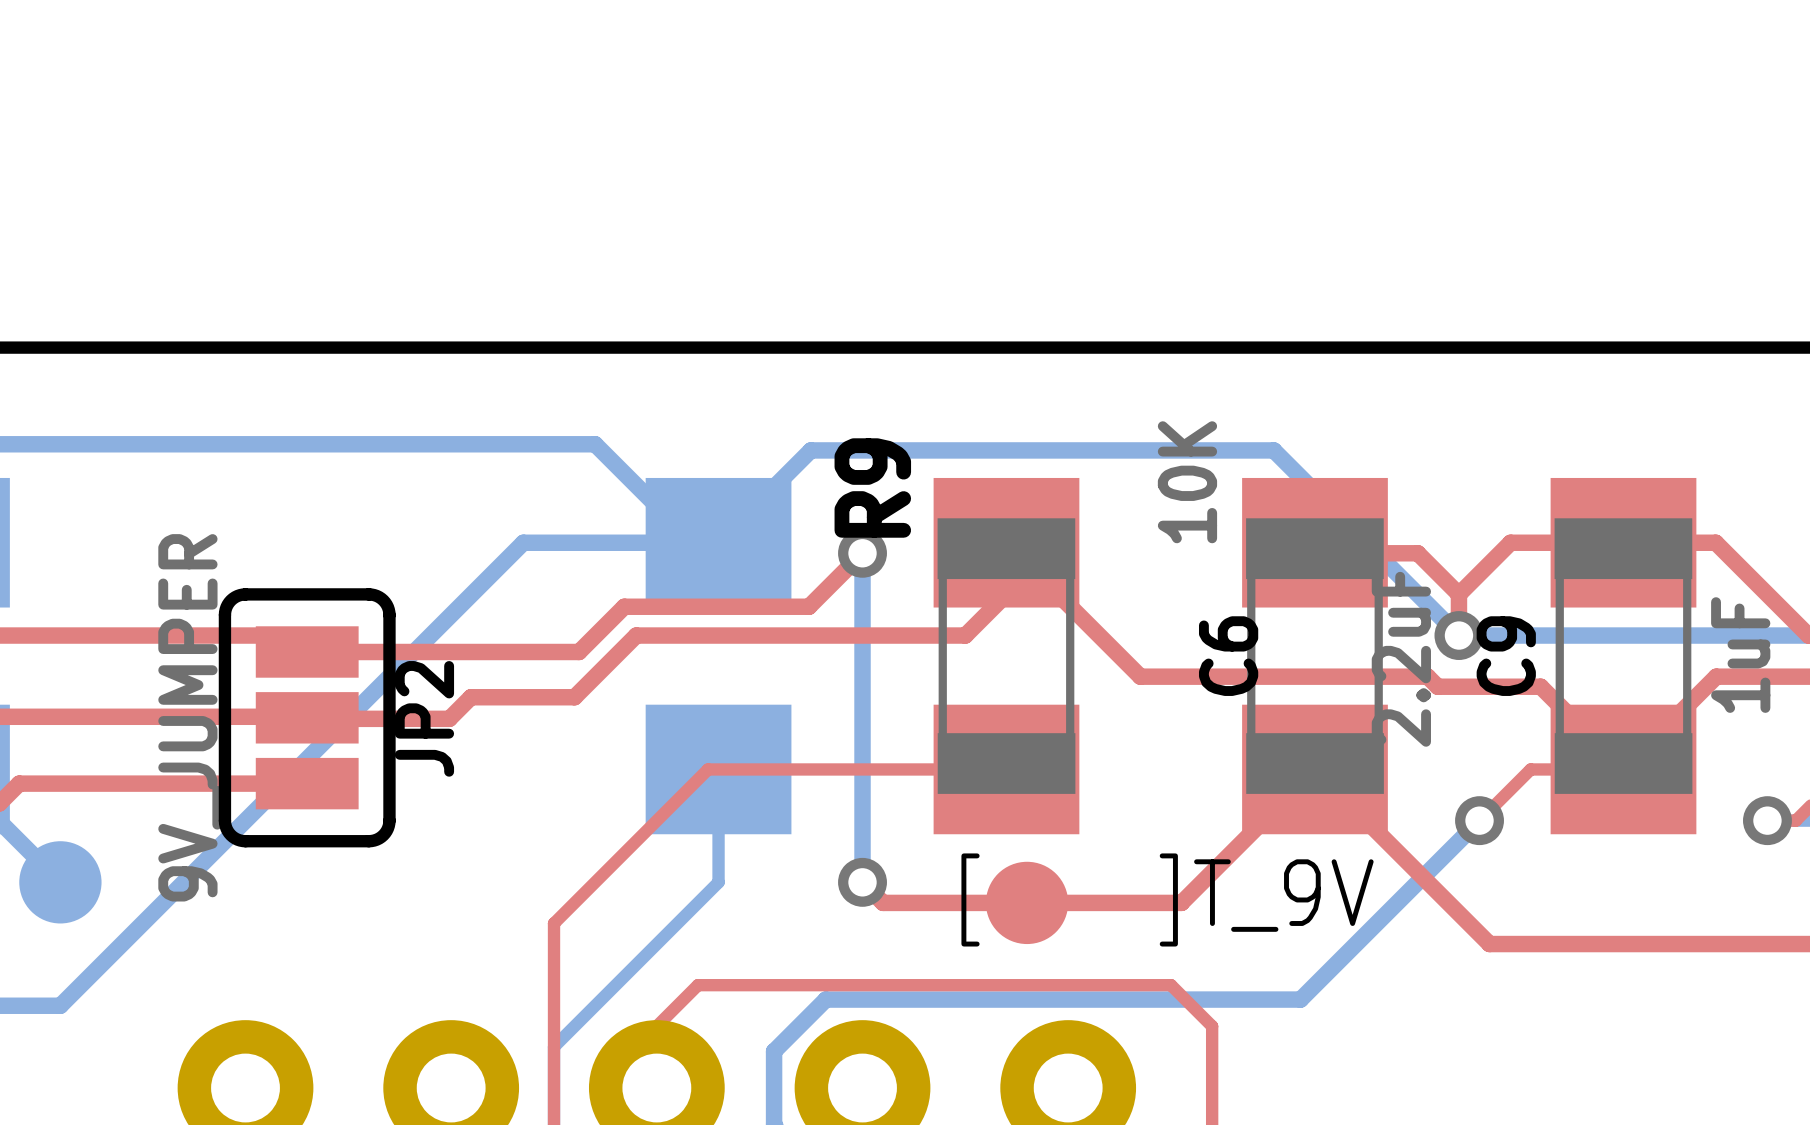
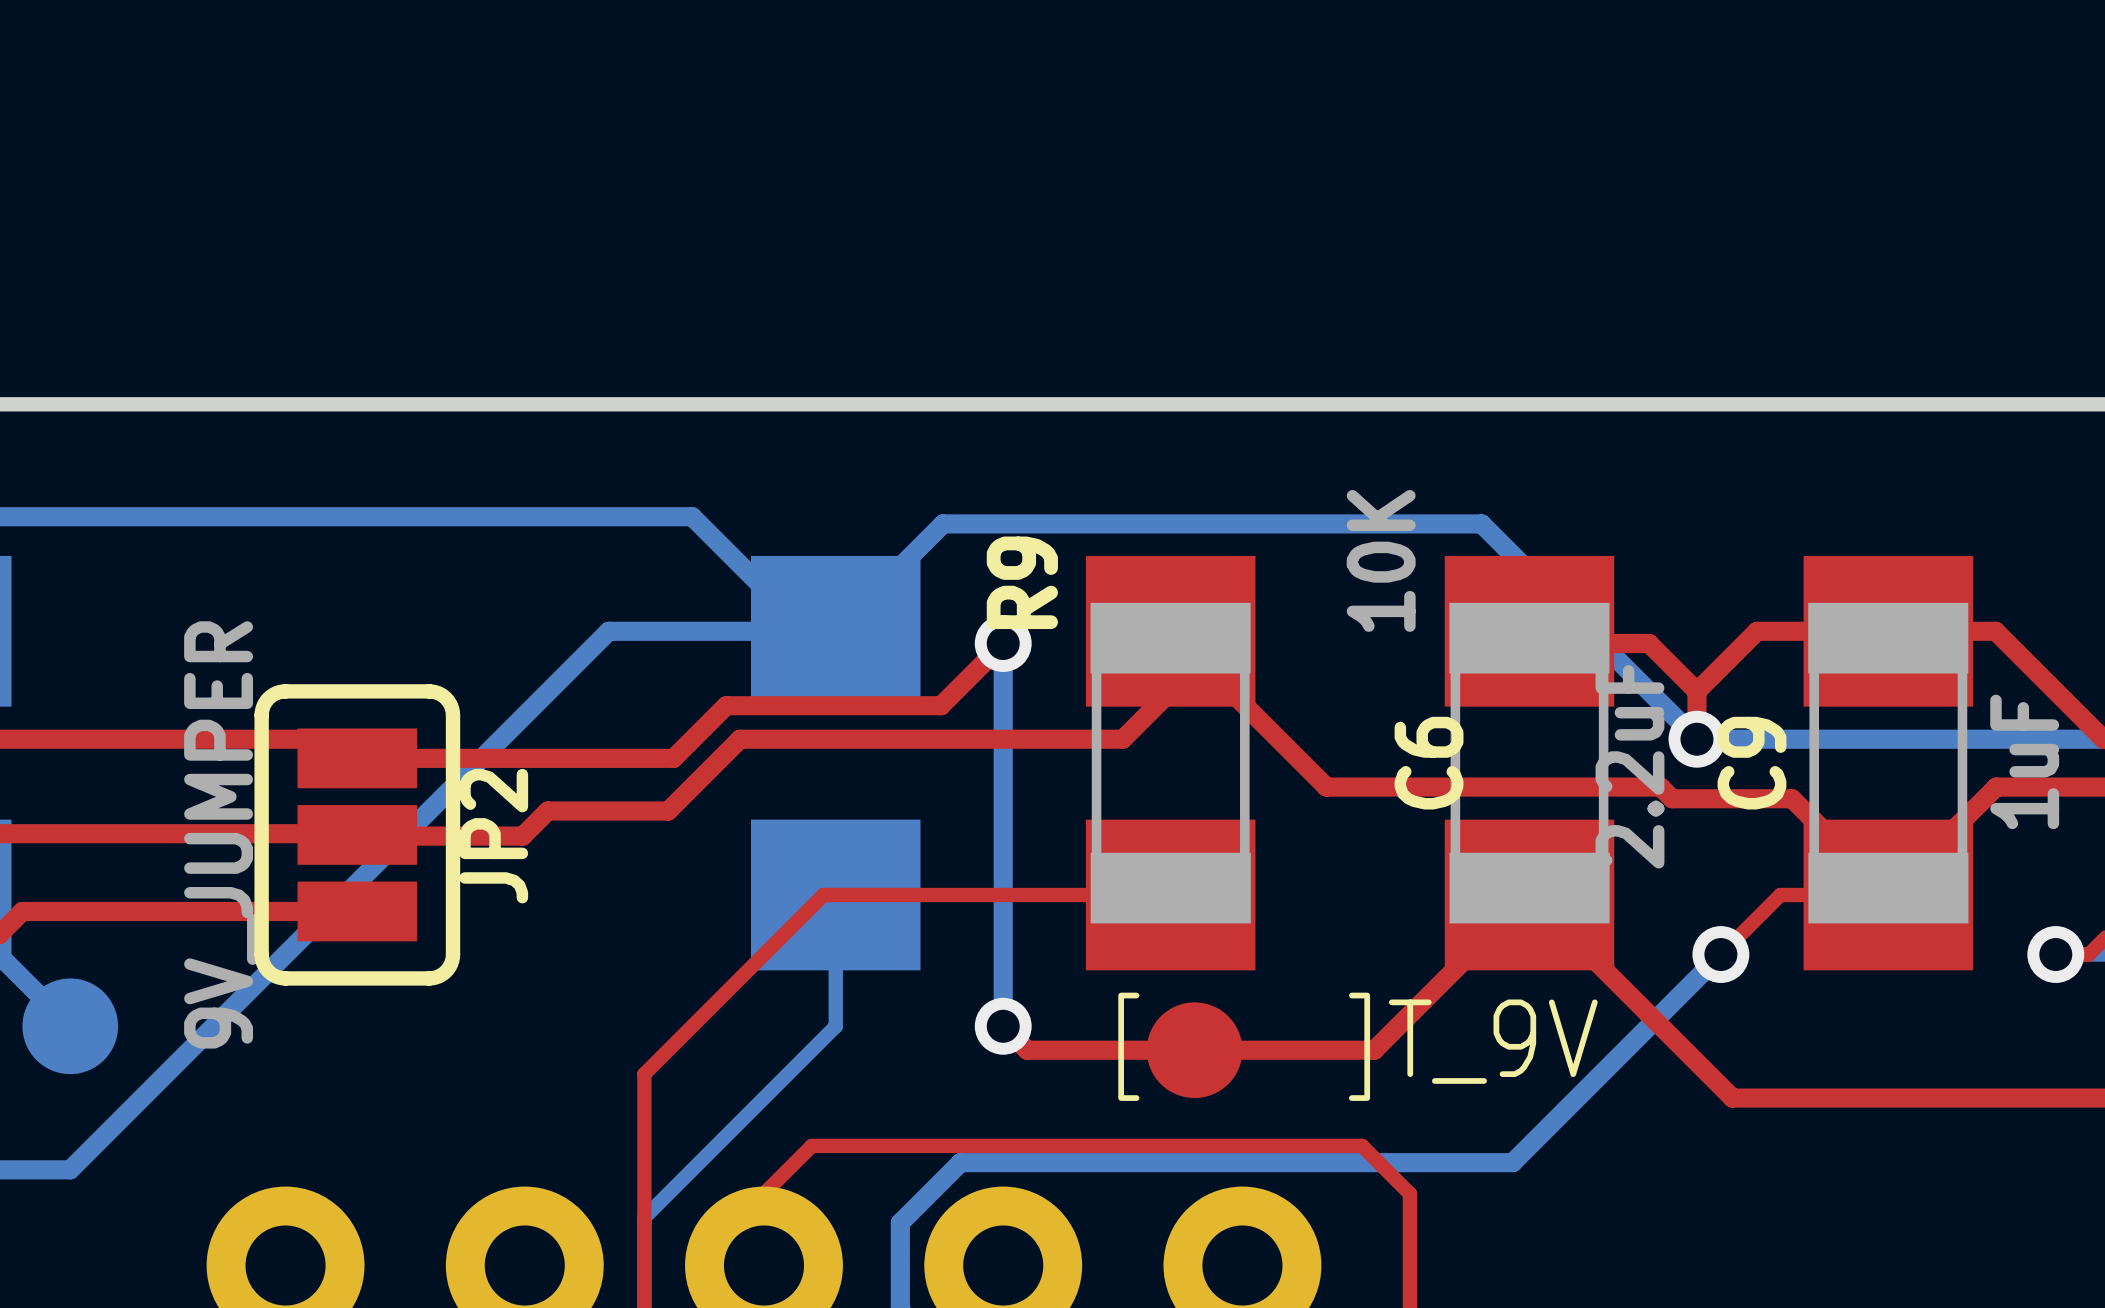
R9 name position: R9 (872, 488) -> R9 (1022, 582)

